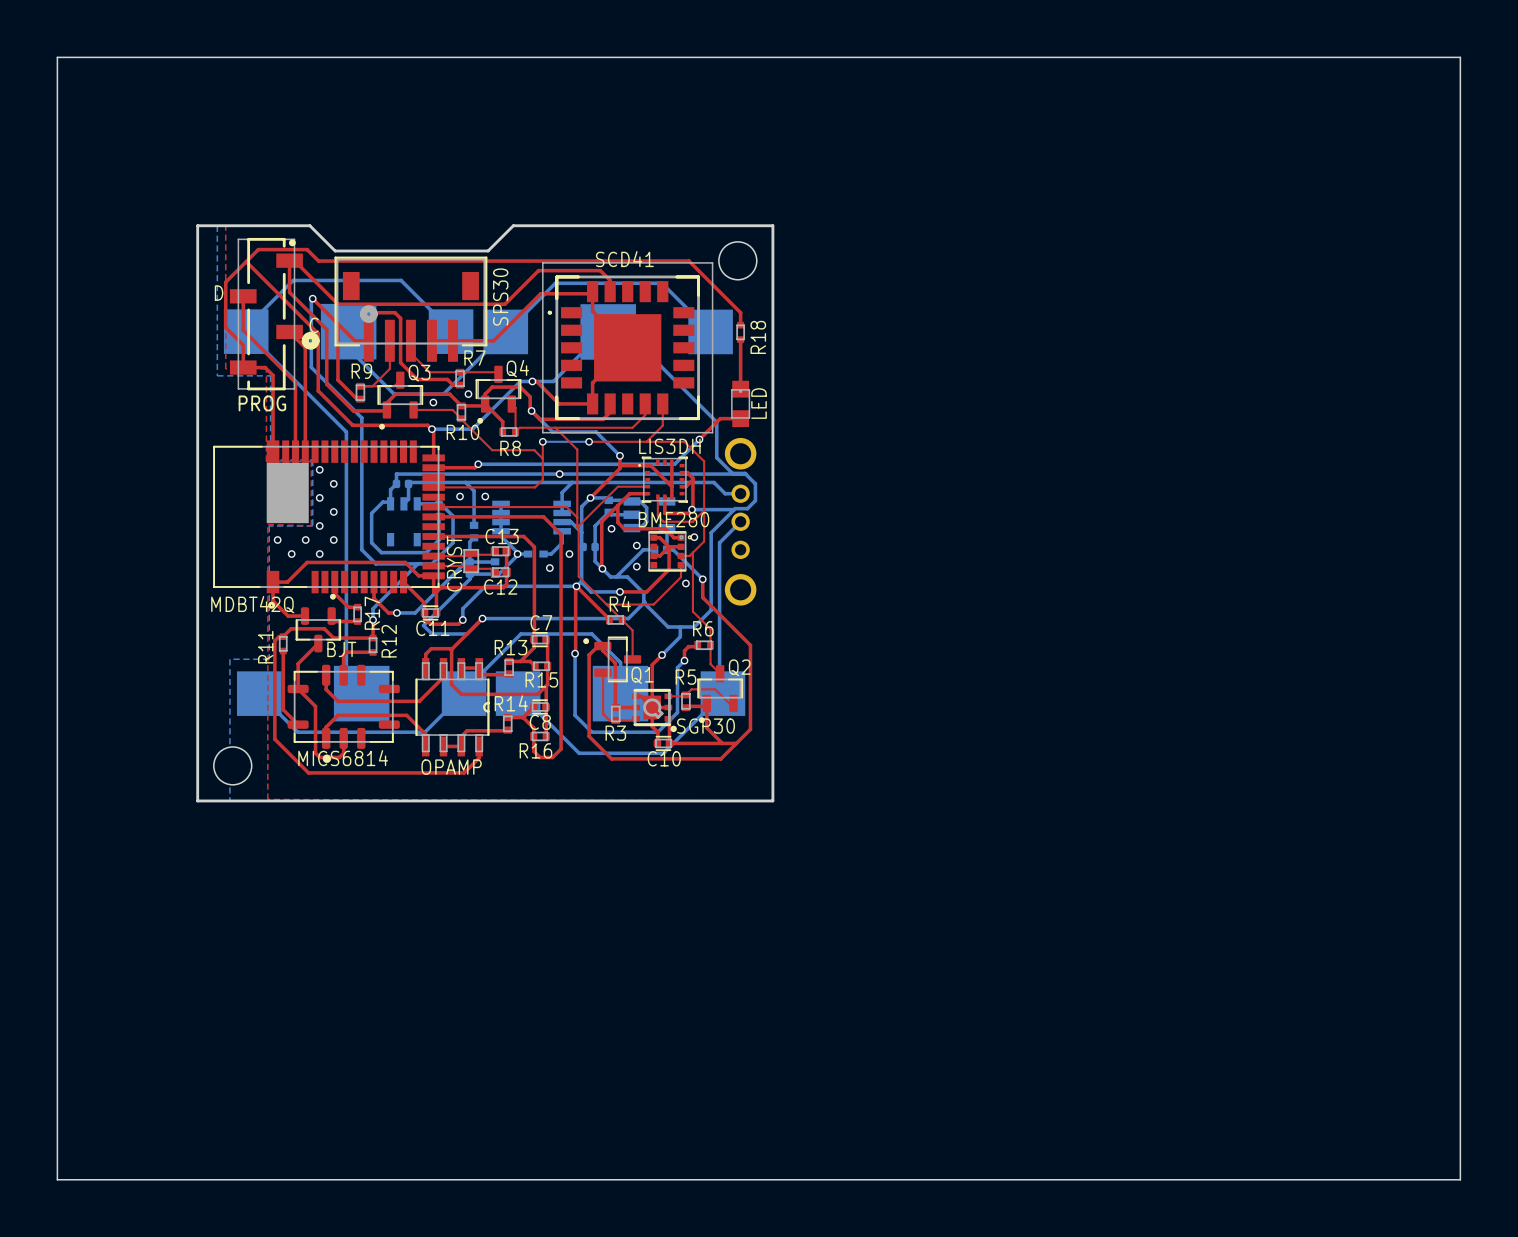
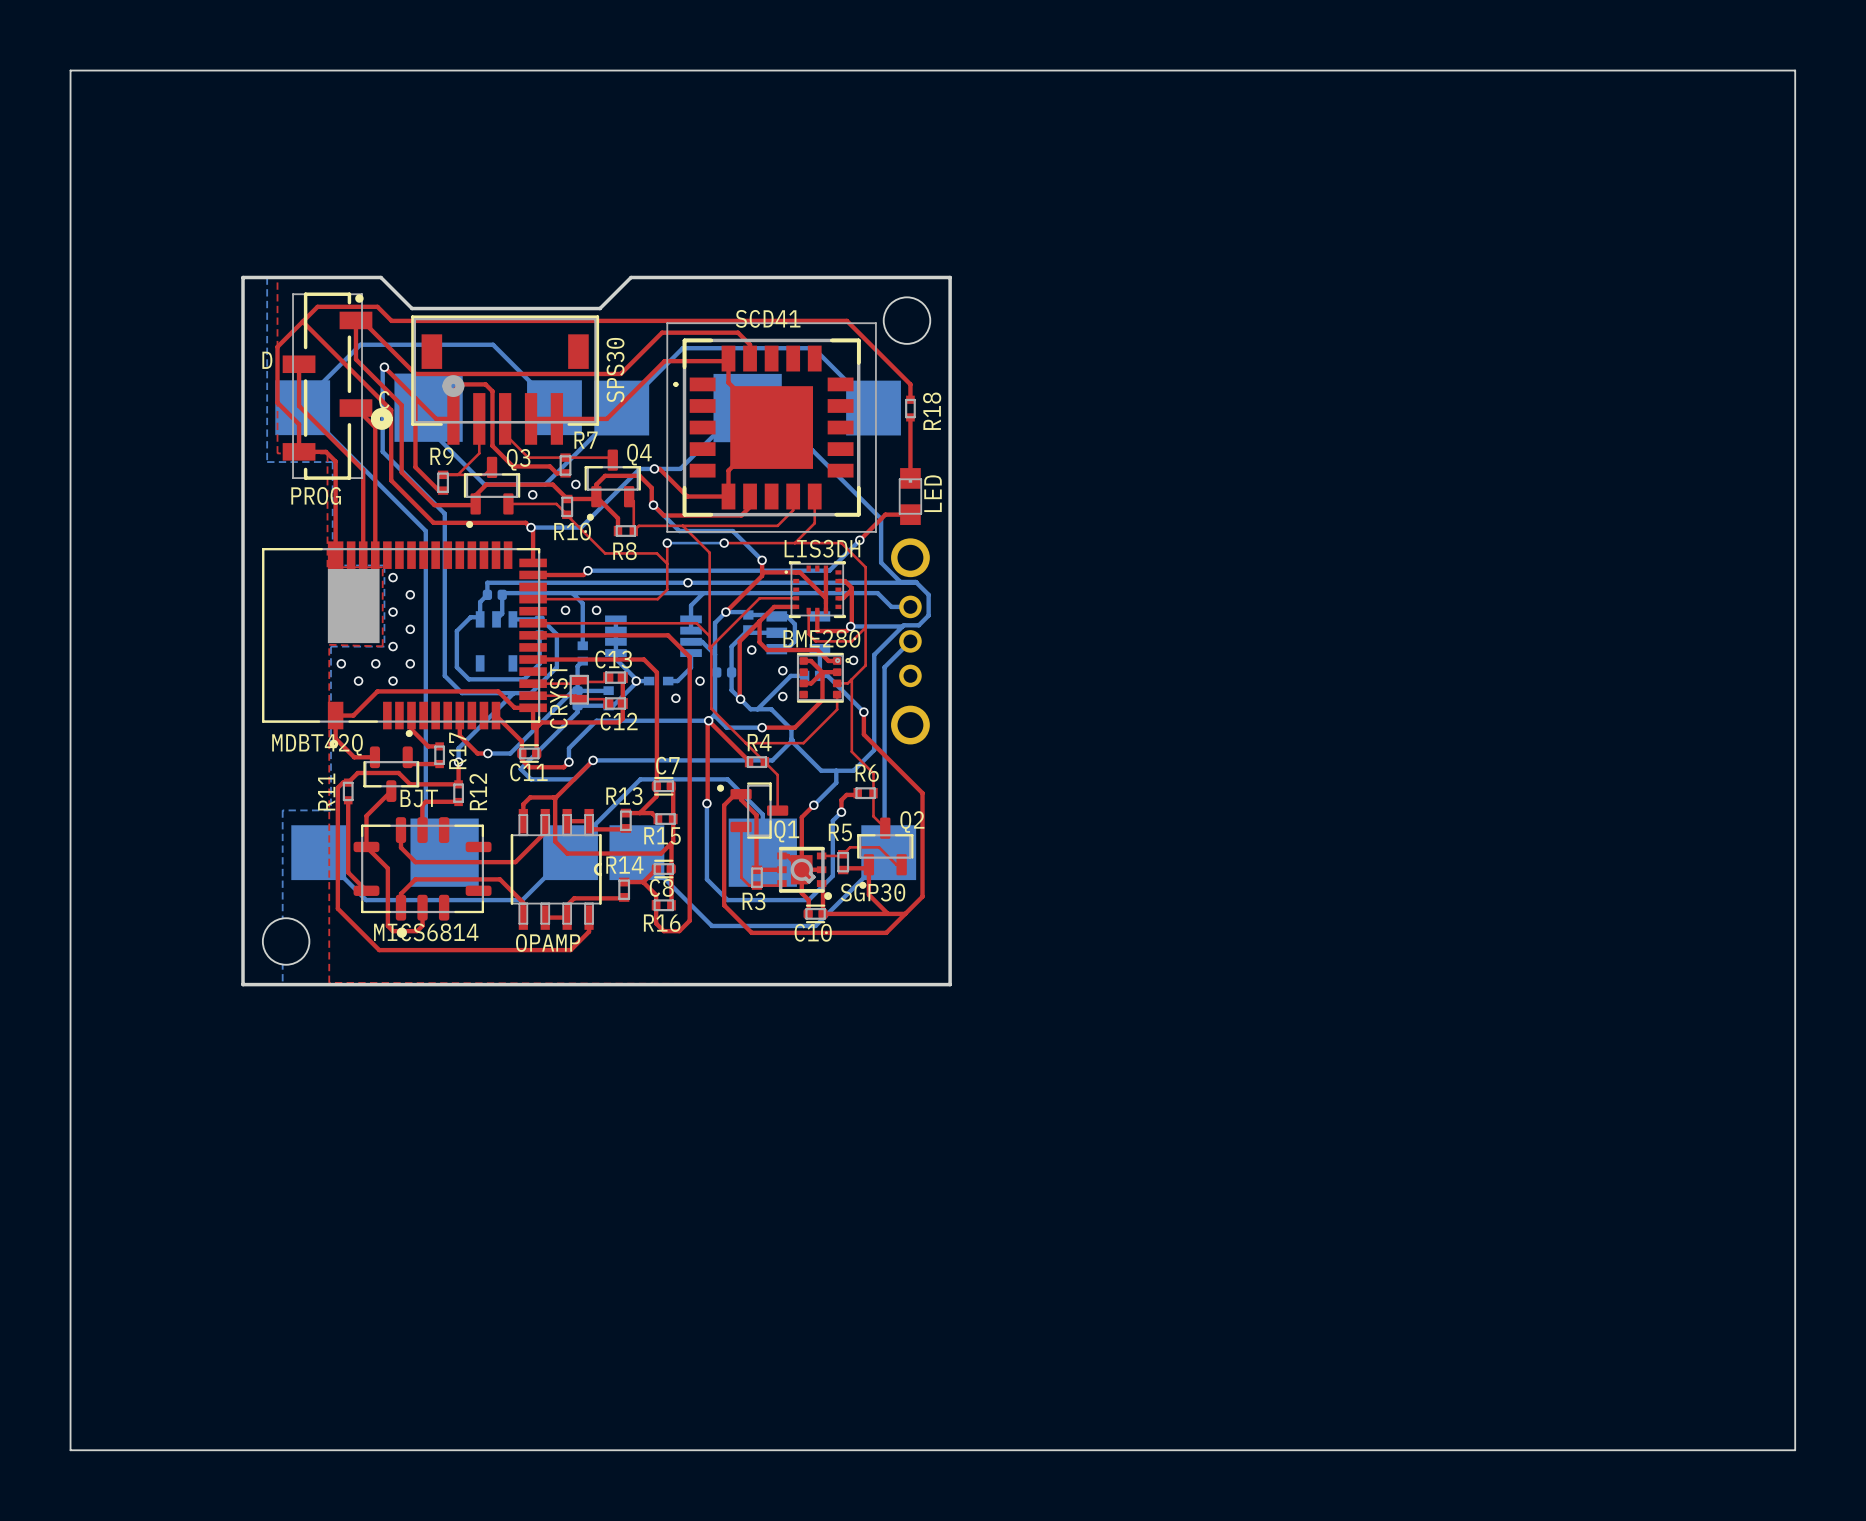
via: (685, 583) -> none

